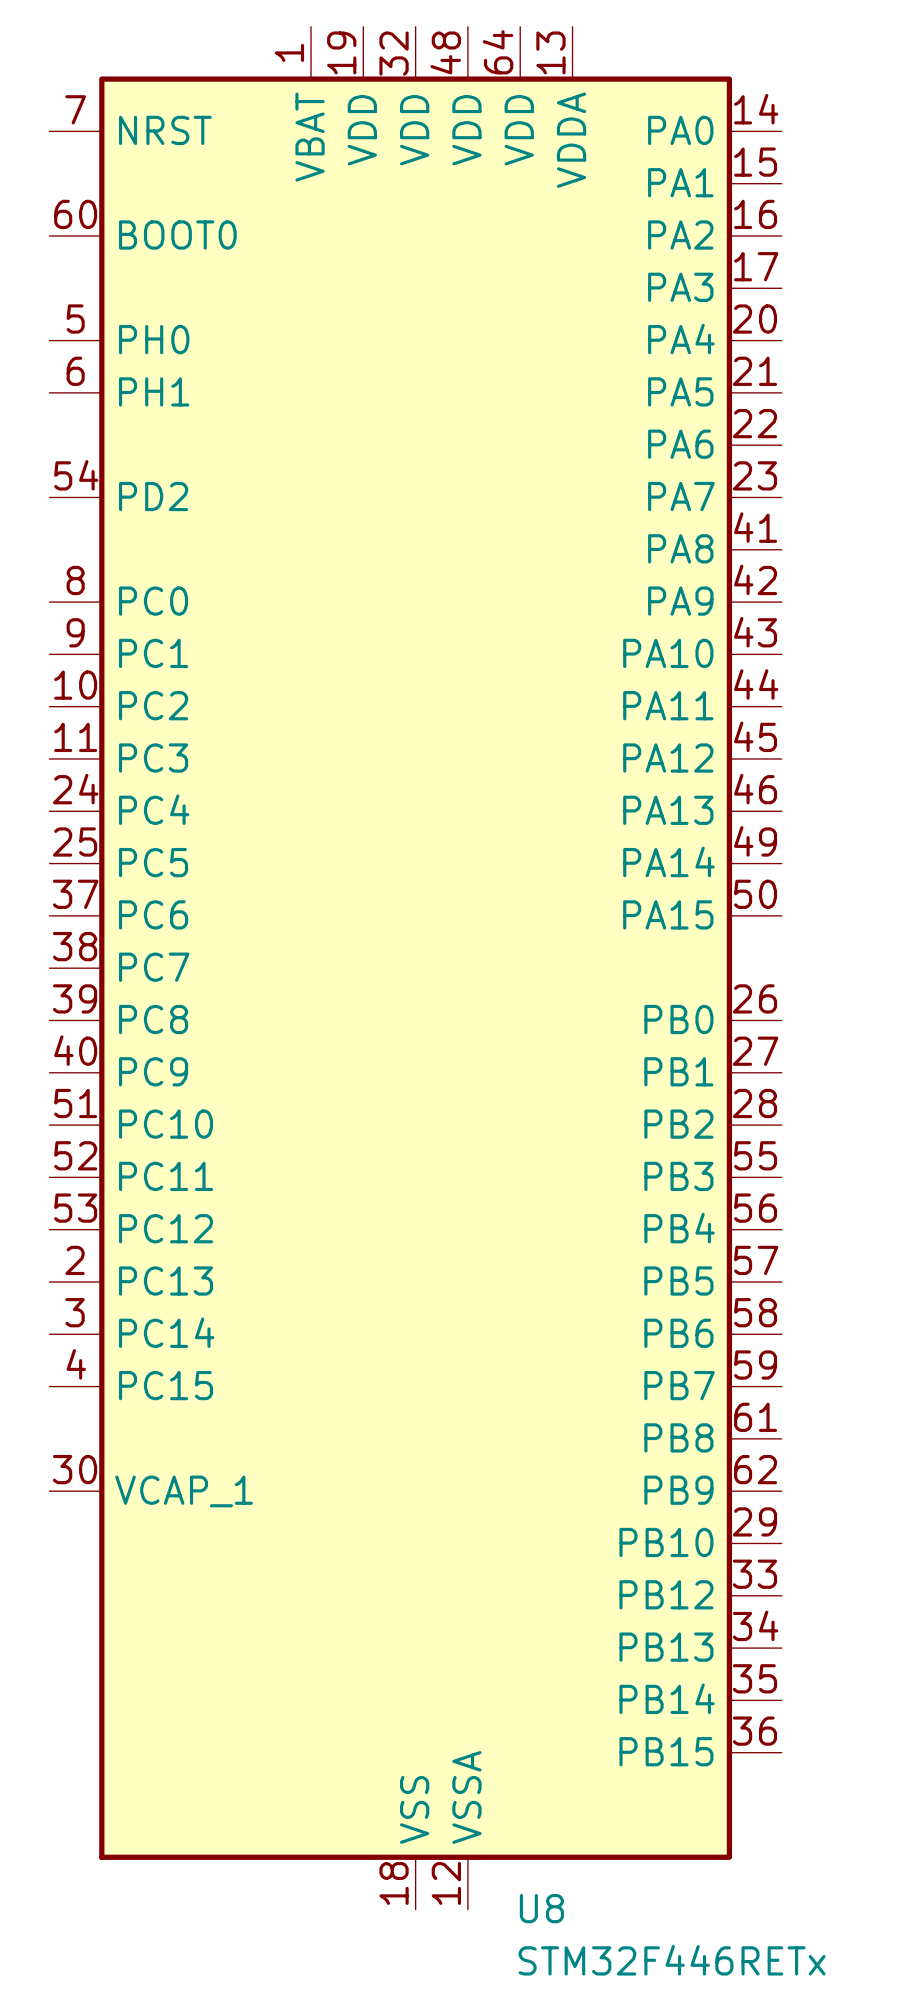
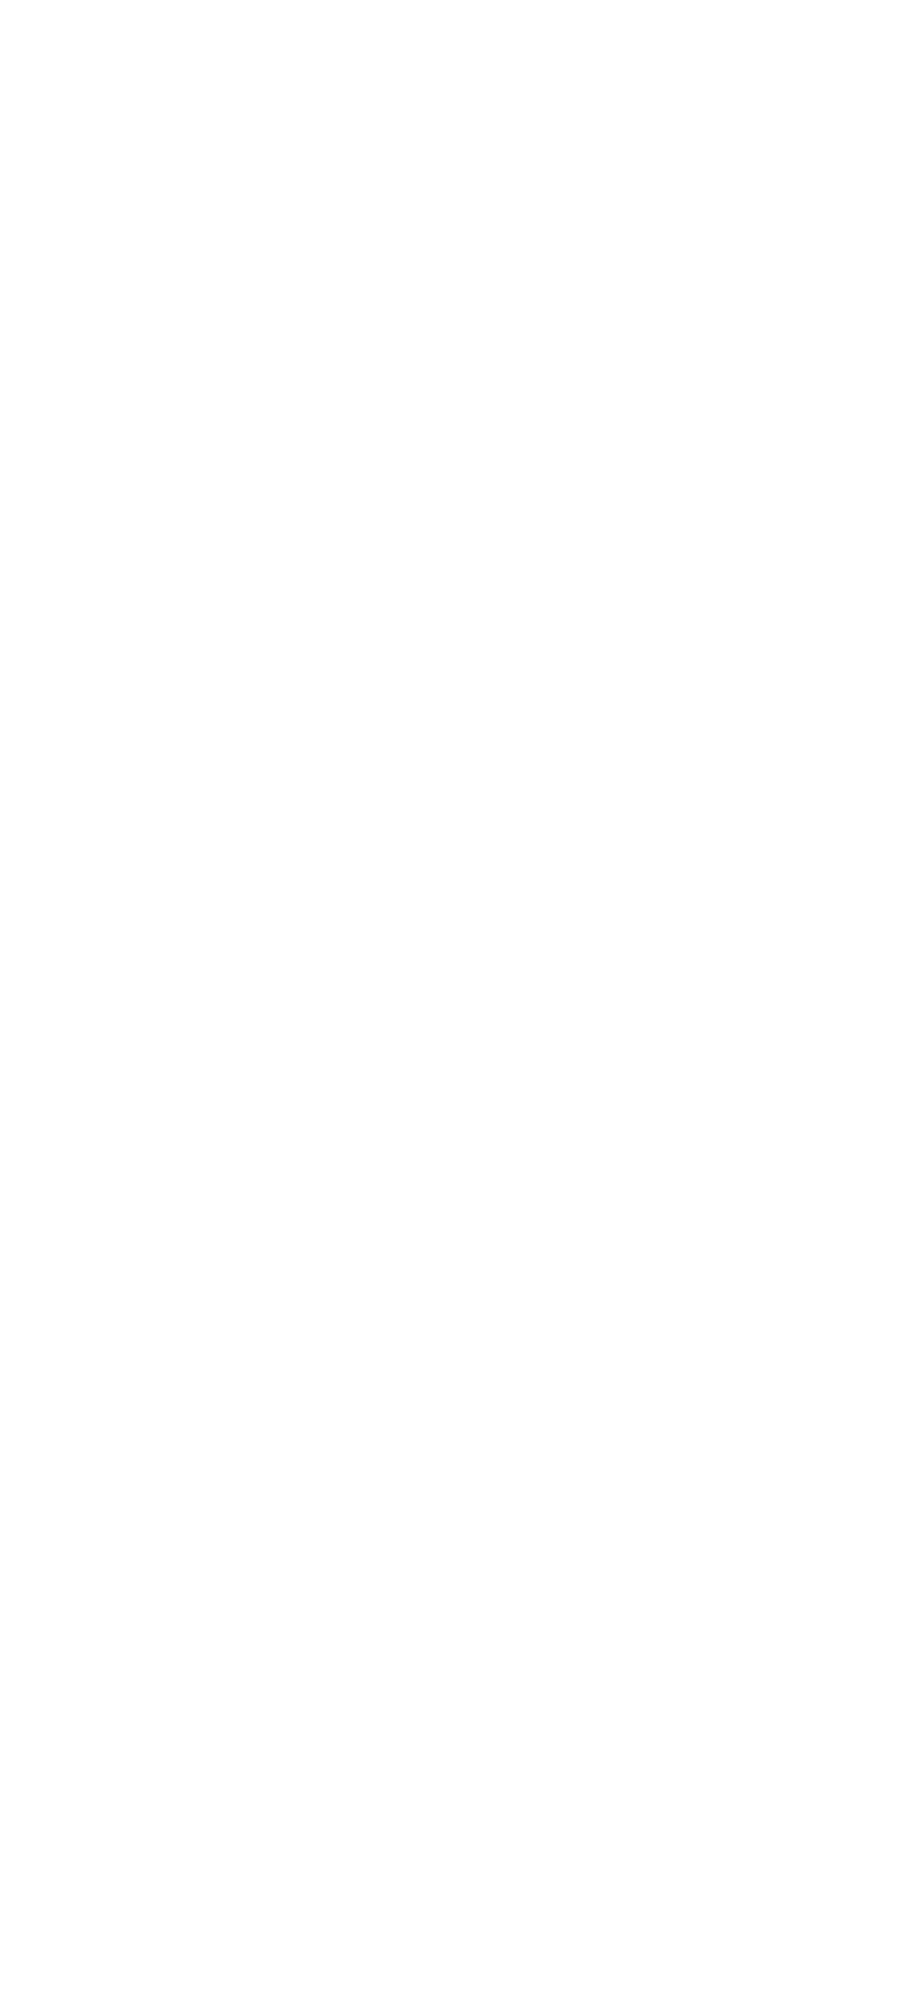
U8: STM32F446RETx (415, 968) -> none

